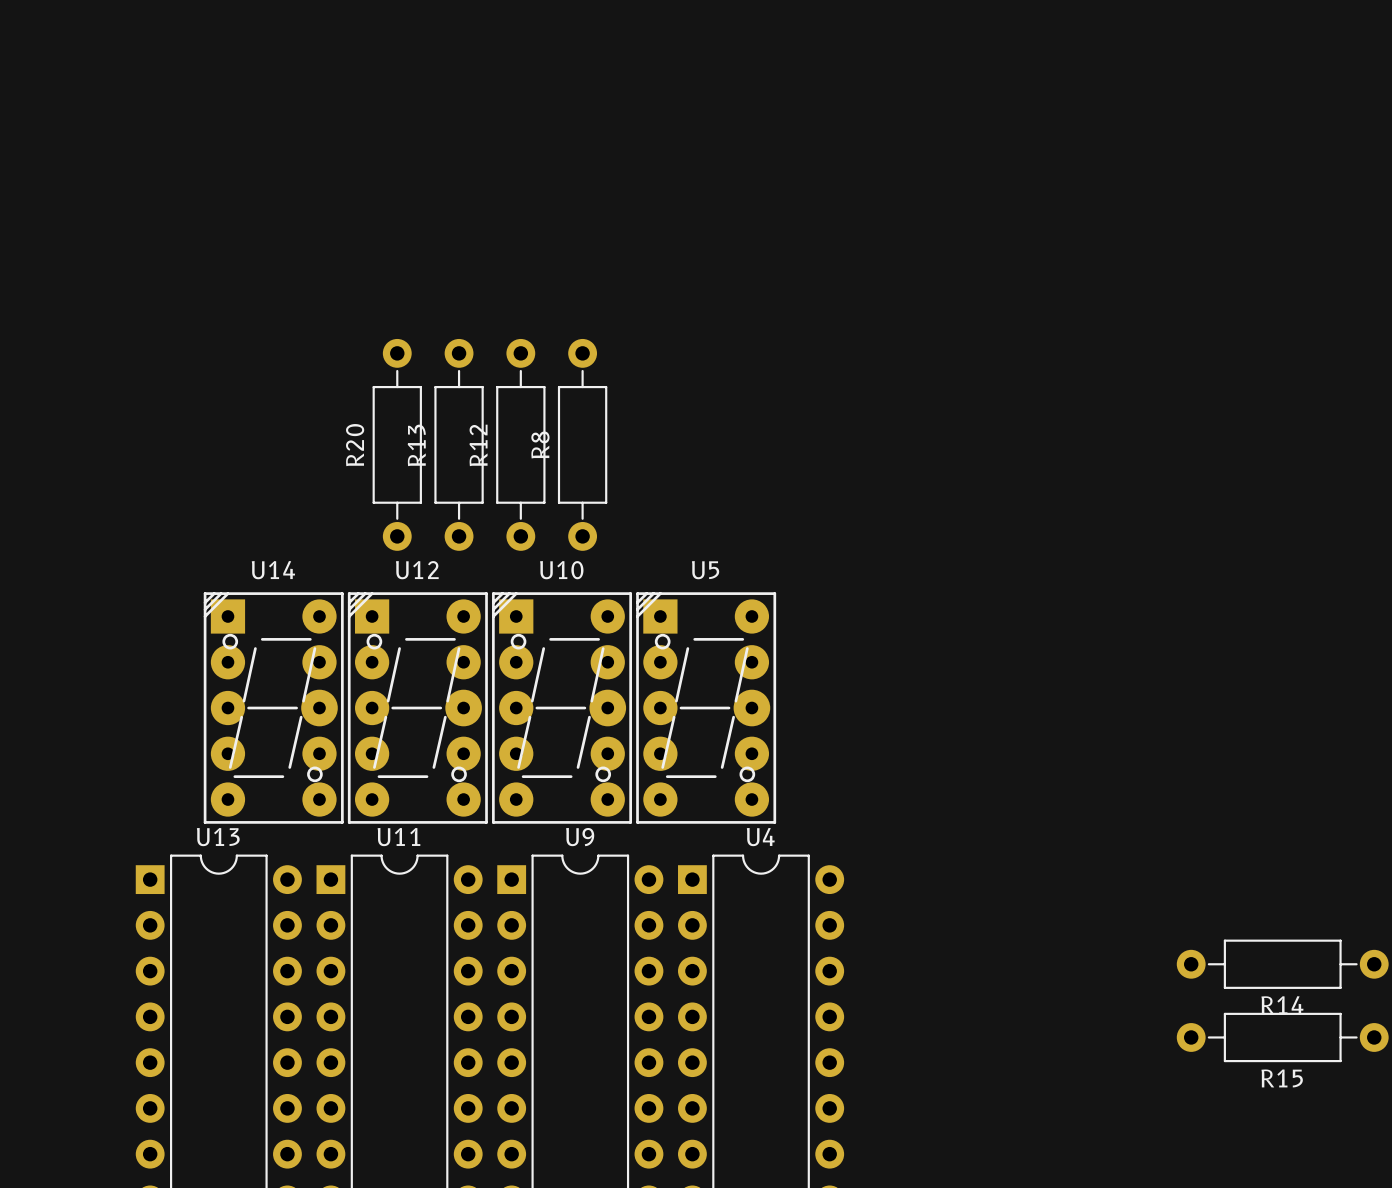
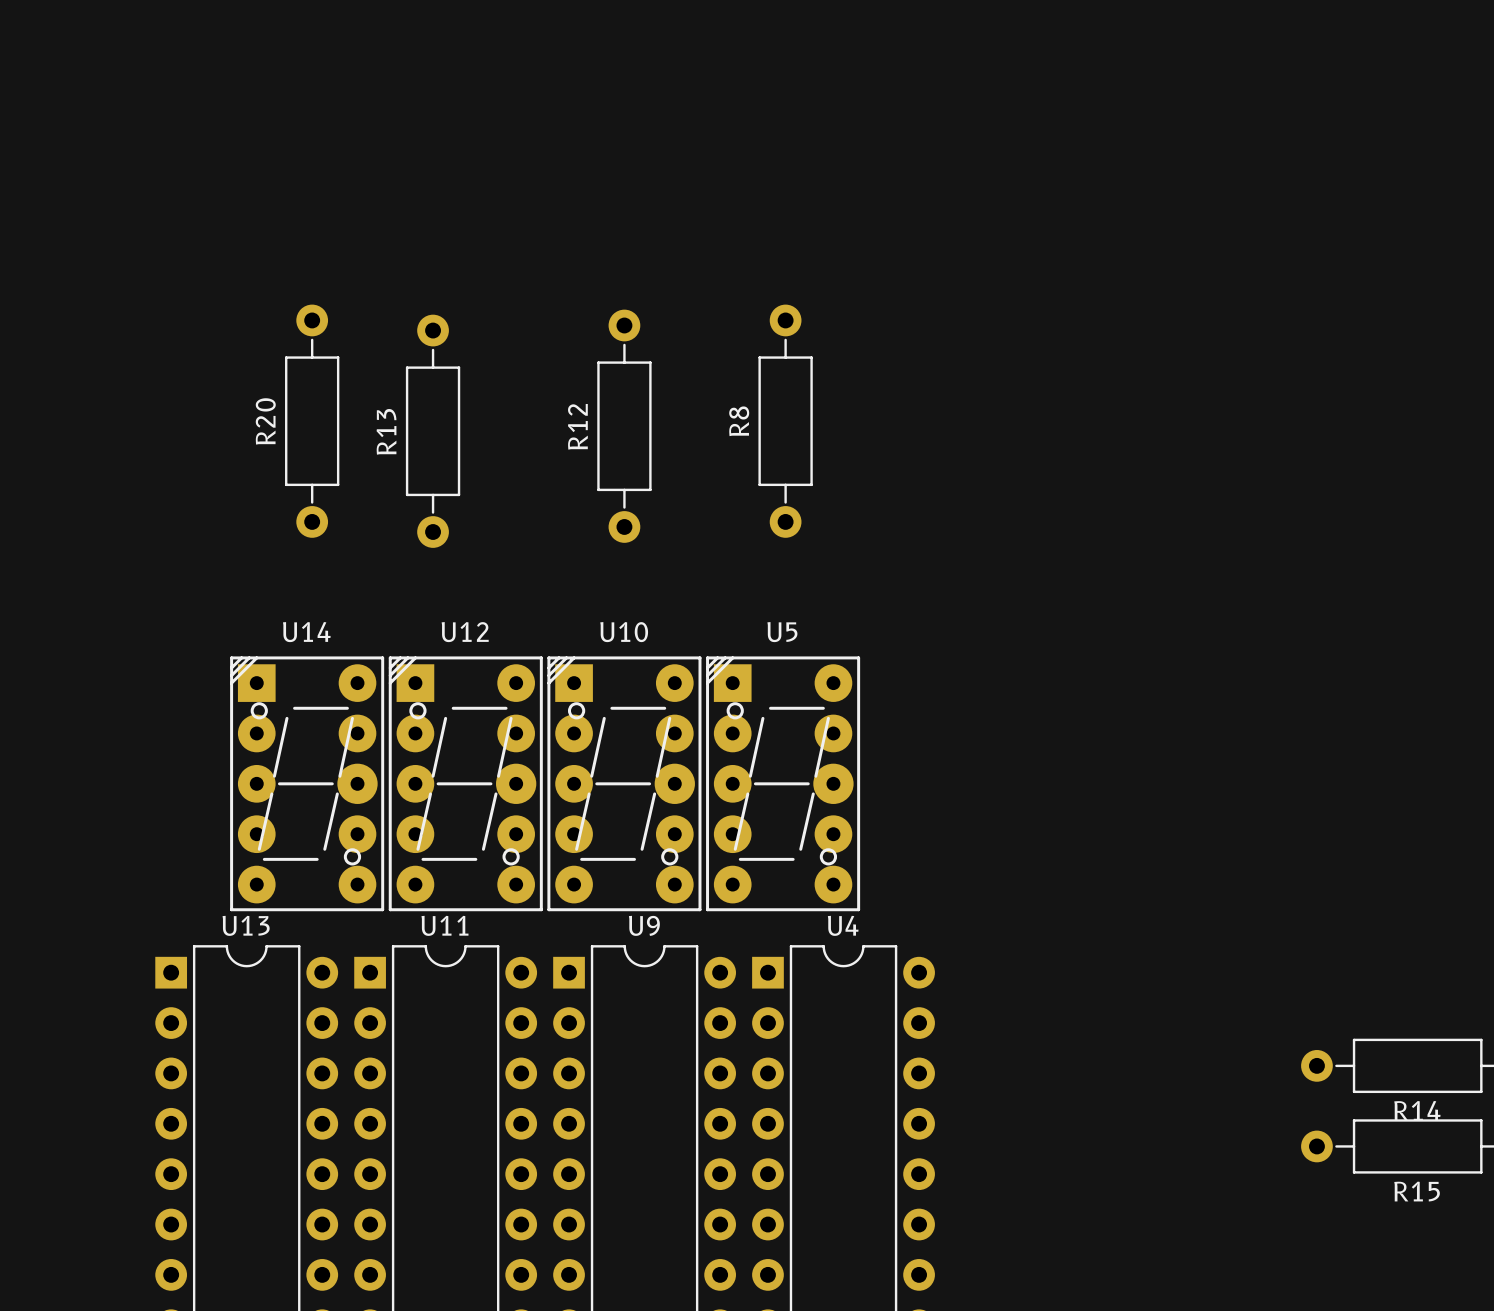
R20 position: (397, 444) -> (312, 421)
R13 position: (459, 444) -> (433, 431)
R12 position: (520, 444) -> (624, 426)
R8 position: (582, 444) -> (785, 421)

